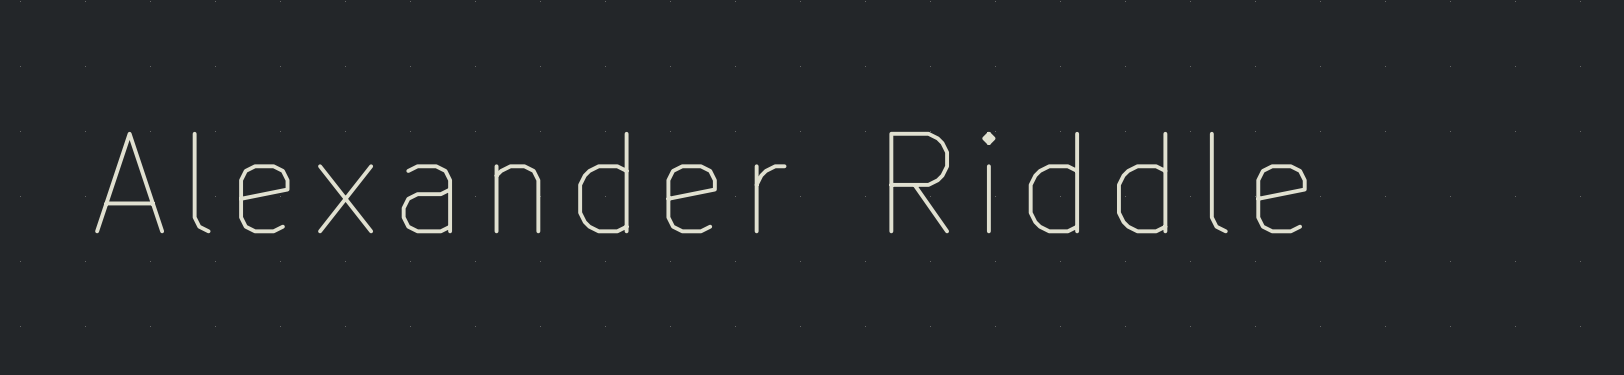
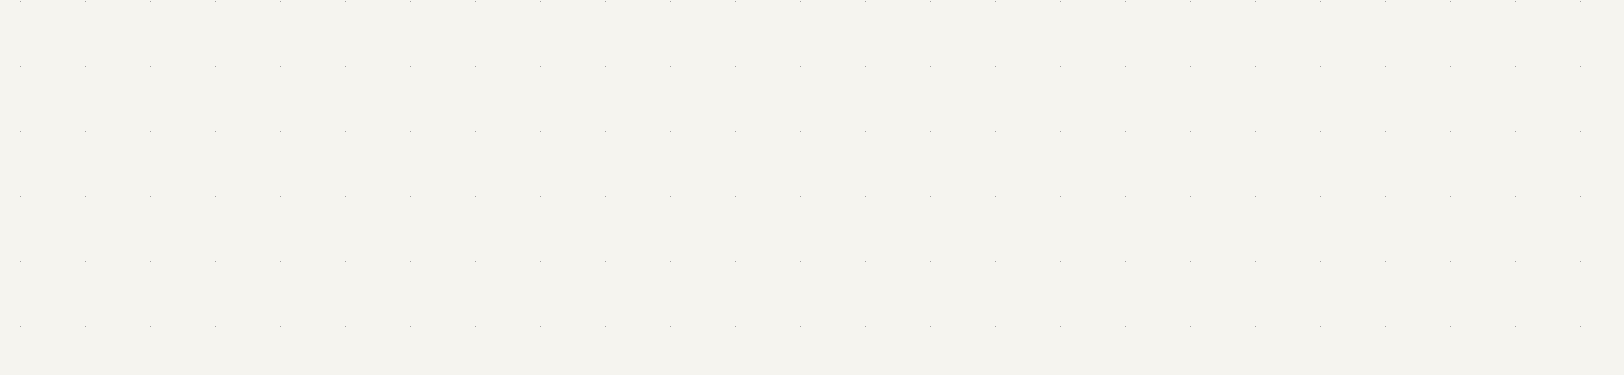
label: Alexander Riddle (700, 182) -> none

